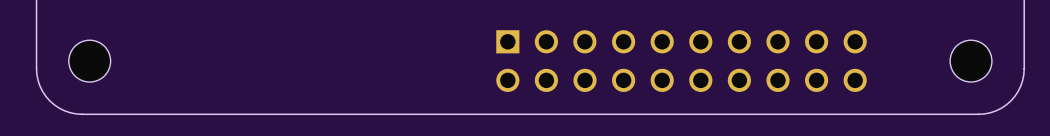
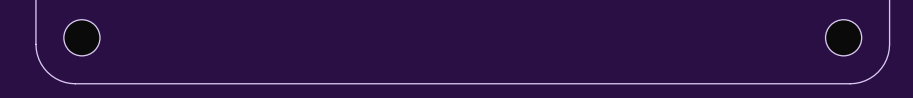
part: (681, 61) -> none

